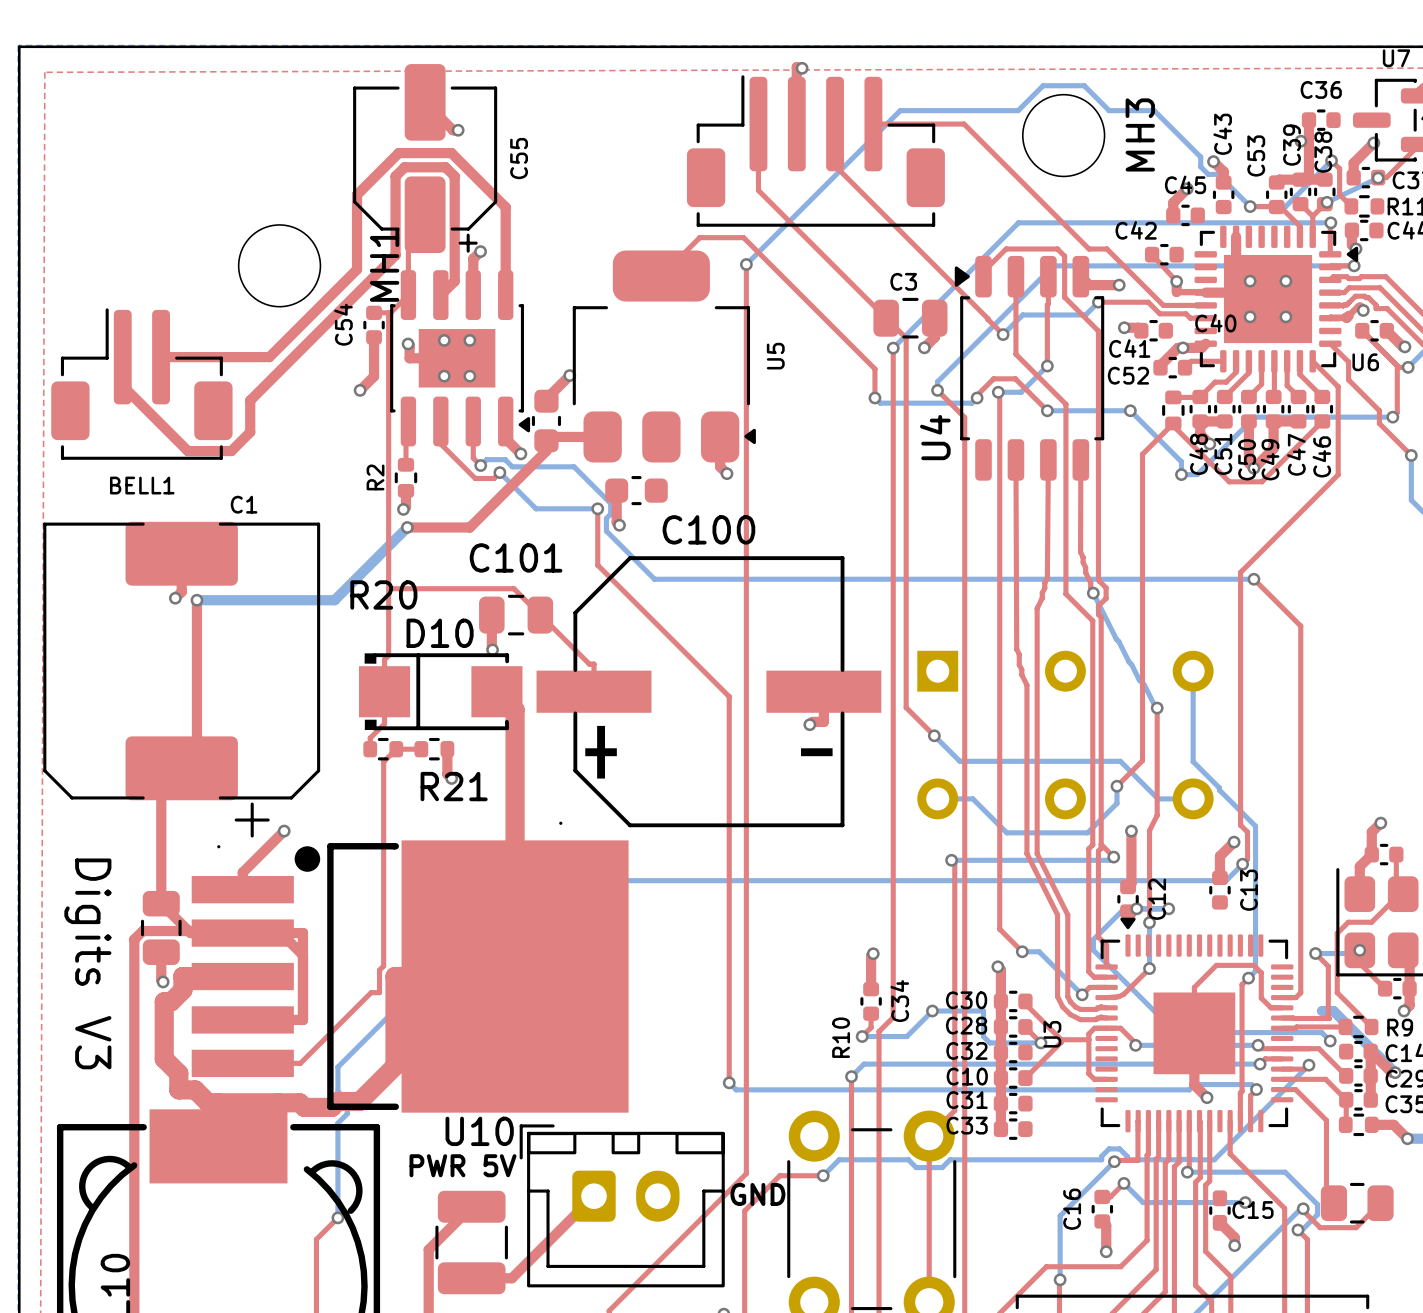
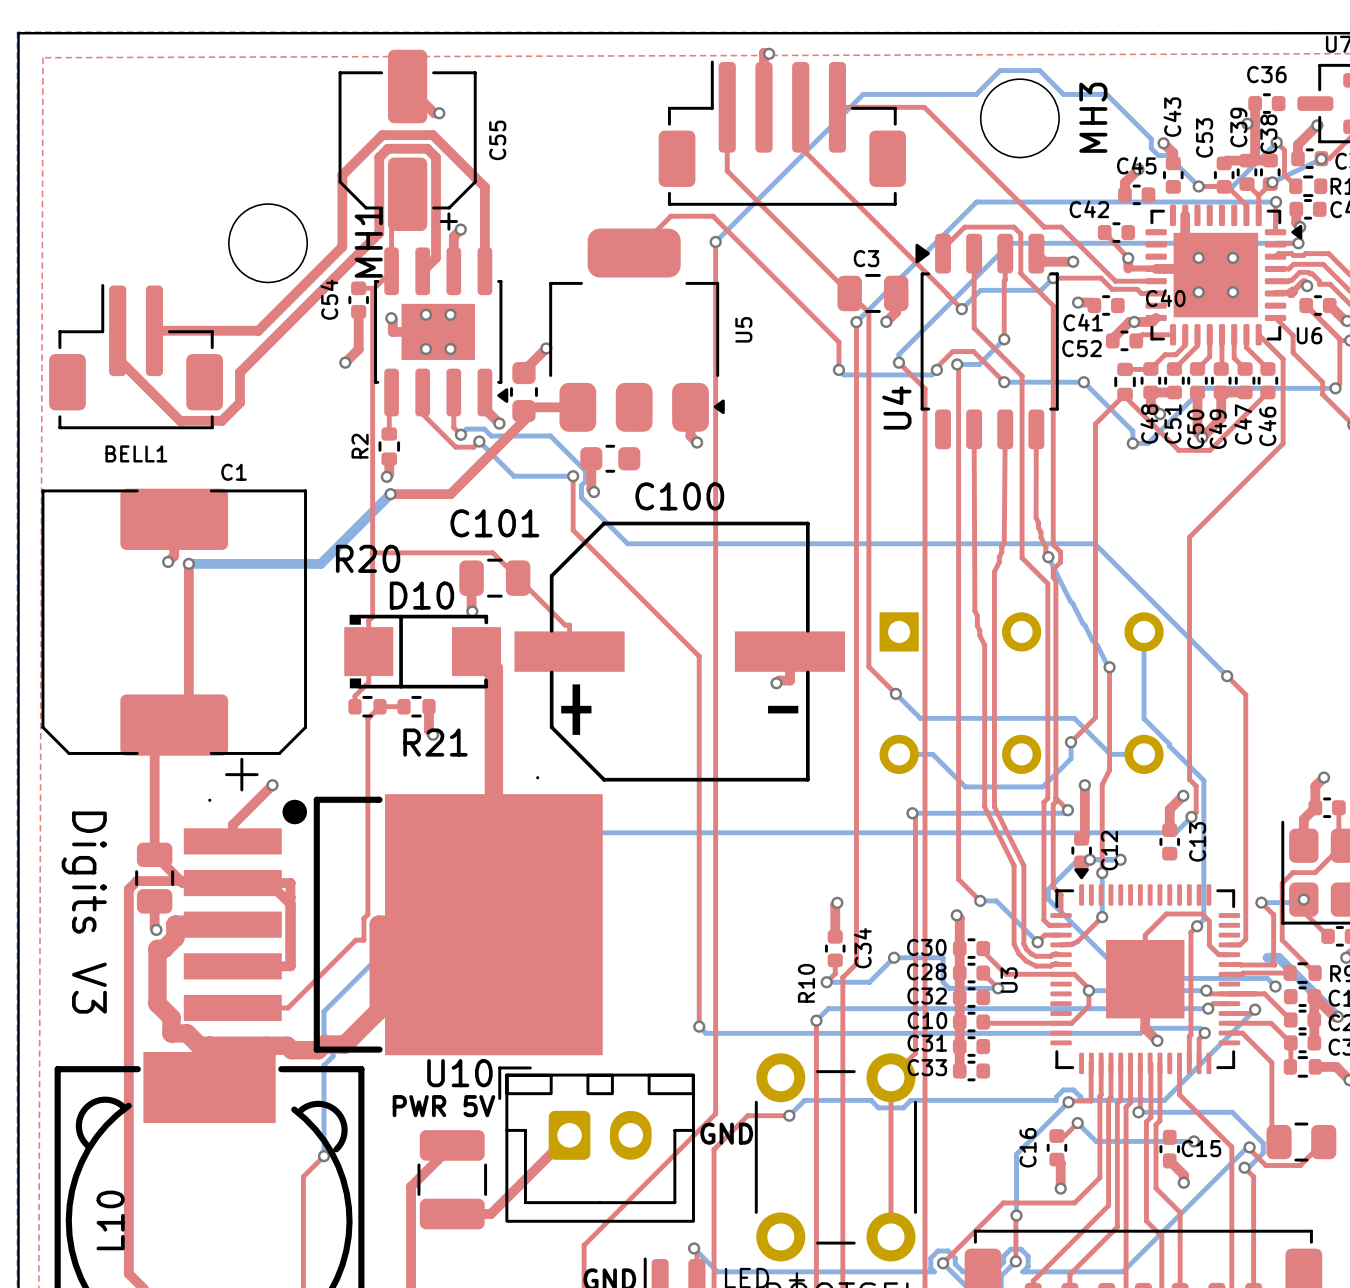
bottom track: (1141, 579) (1253, 579) -> (1094, 543) (1227, 676)
top track: (1253, 579) (1300, 626) (1300, 992) (1293, 997) -> (1227, 676) (1245, 694) (1245, 939) (1240, 944)
via position: (1253, 579) -> (1227, 676)
top track: (1025, 1003) (1061, 1039) -> (983, 950) (1005, 974) (1049, 974)
top track: (1094, 1028) (1088, 1033) (1088, 1073) (1094, 1079) -> none
top track: (1061, 1039) (1061, 1042) (1025, 1078) -> (1049, 1023) (983, 1022)
top track: (1061, 1039) (1088, 1039) -> none
top track: none -> (1088, 990) (1088, 1006) (1071, 1023) (1061, 1023)

